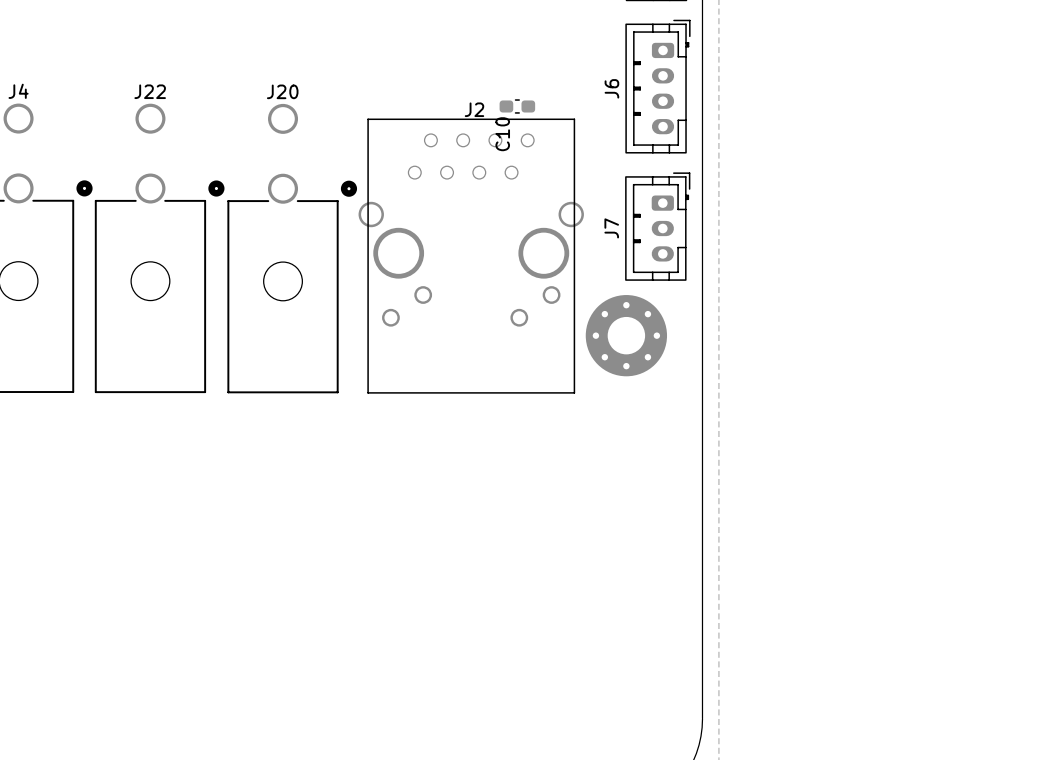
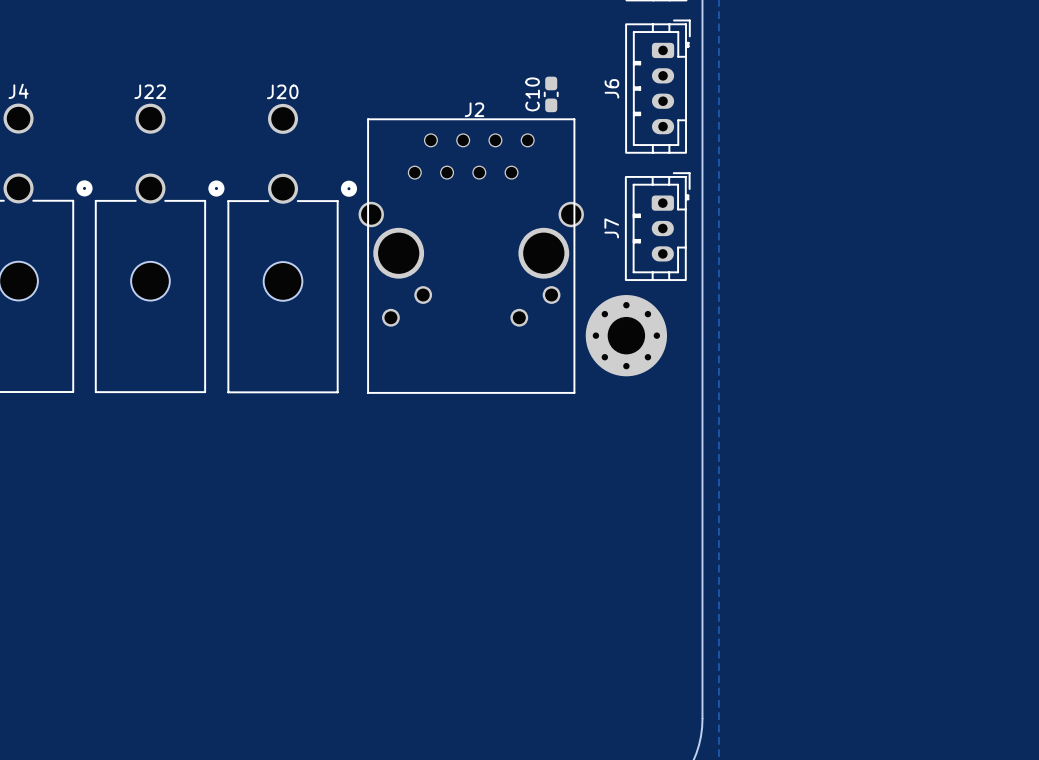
C10 rotation: 0° (517, 106) -> 90° clockwise (551, 94)
C10 position: (517, 106) -> (551, 94)

